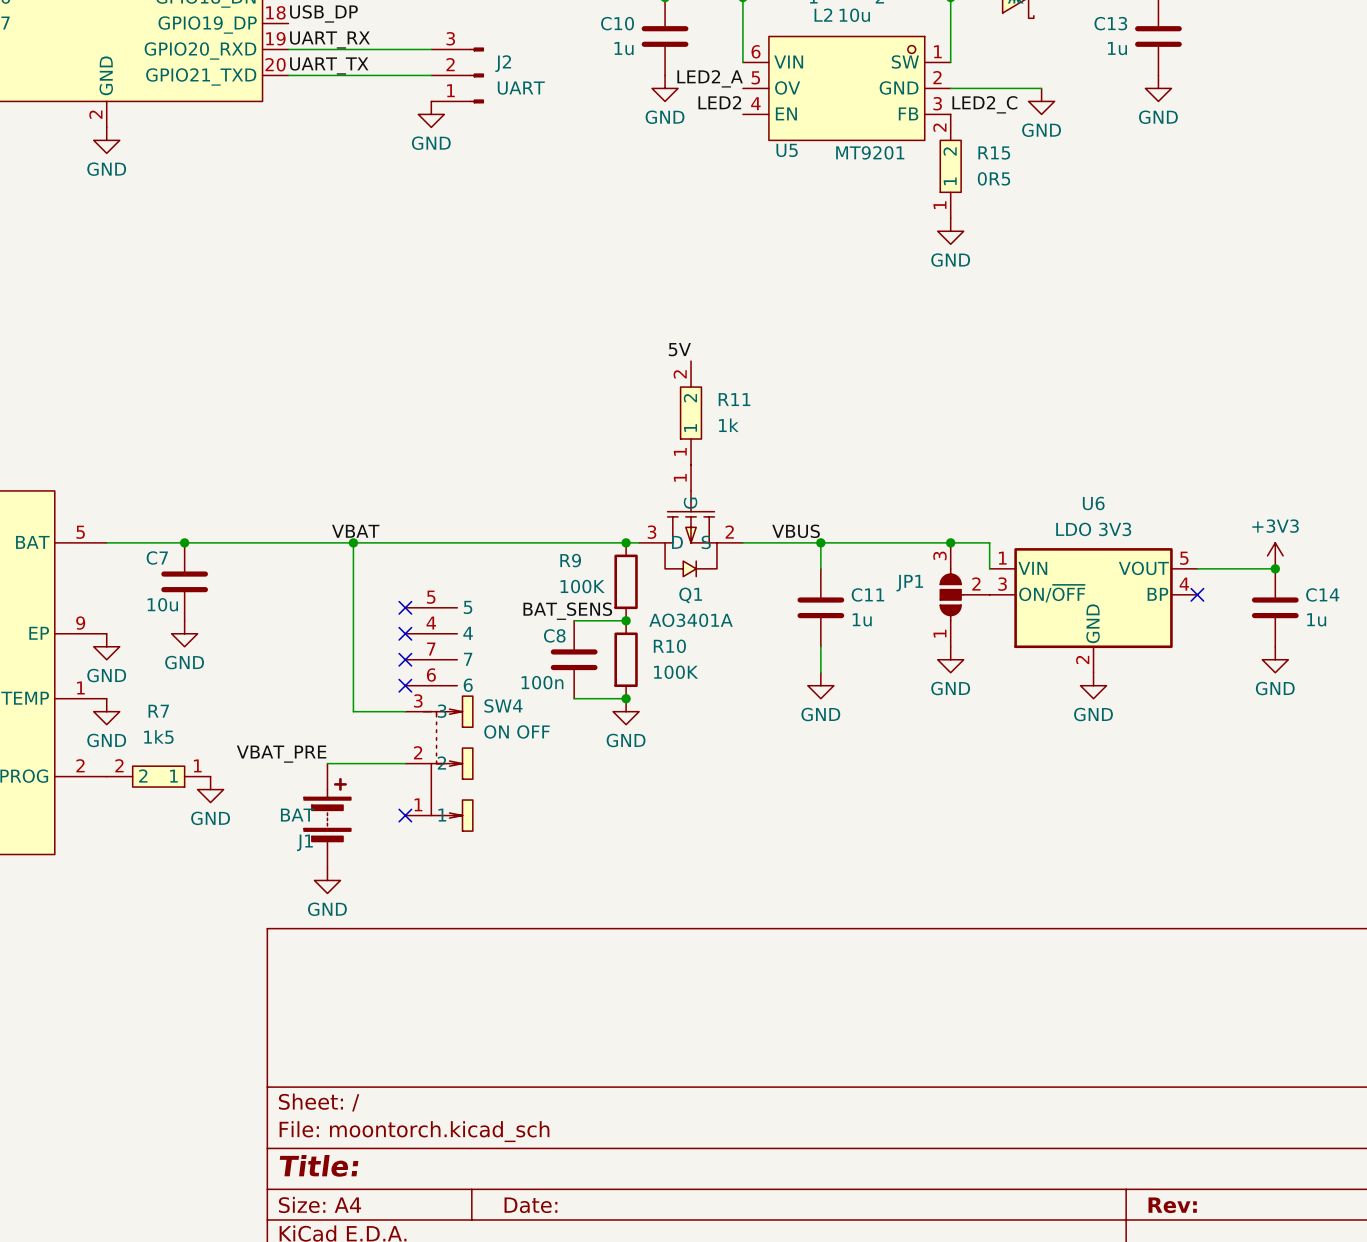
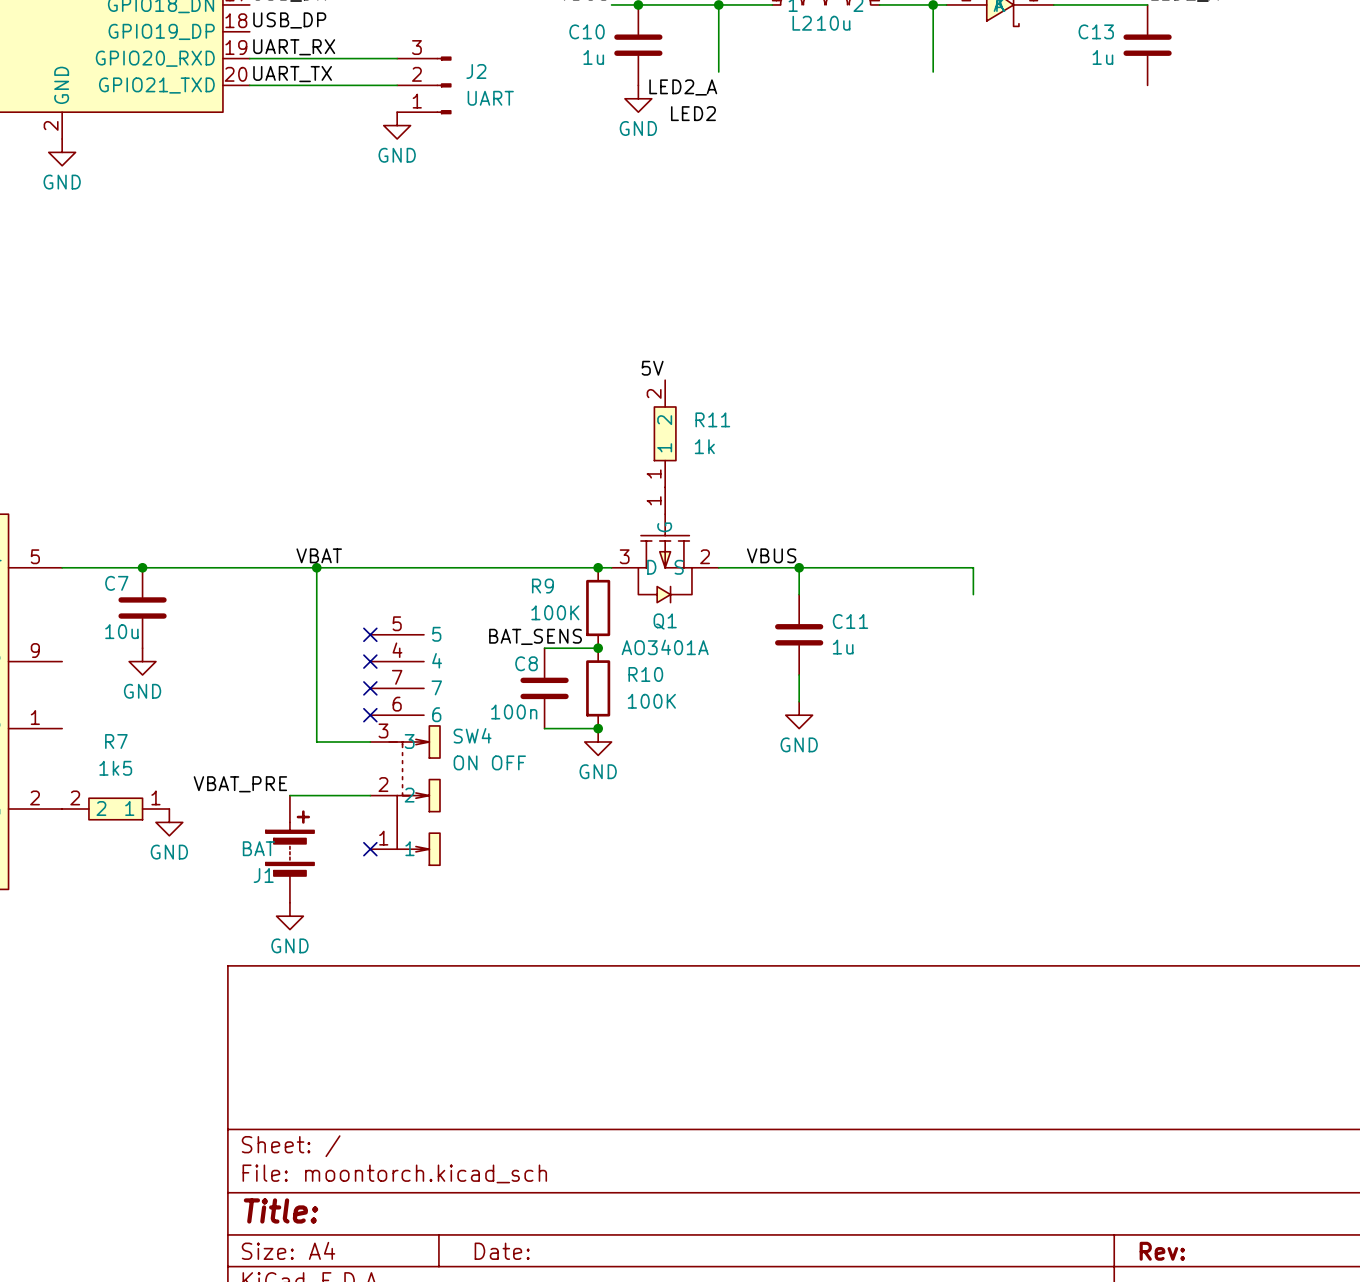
U5: MT9201 (846, 88) -> none
wire: (950, 88) (1041, 88) -> none
power symbol: GND (1158, 88) -> none
power symbol: GND (1041, 101) -> none
label: LED2_C (984, 104) -> none
R15: 0R5 (950, 166) -> none
power symbol: GND (950, 231) -> none
junction: (950, 542) -> none
power symbol: +3V3 (1275, 555) -> none
wire: (1197, 568) (1275, 568) -> none
junction: (1275, 568) -> none
JP1: (964, 594) -> none
no-connect mark: (1197, 594) -> none
C14: 1u (1275, 607) -> none
U6: LDO 3V3 (1093, 610) -> none
power symbol: GND (106, 646) -> none
power symbol: GND (950, 659) -> none
power symbol: GND (1275, 659) -> none
power symbol: GND (1093, 685) -> none
power symbol: GND (106, 711) -> none

